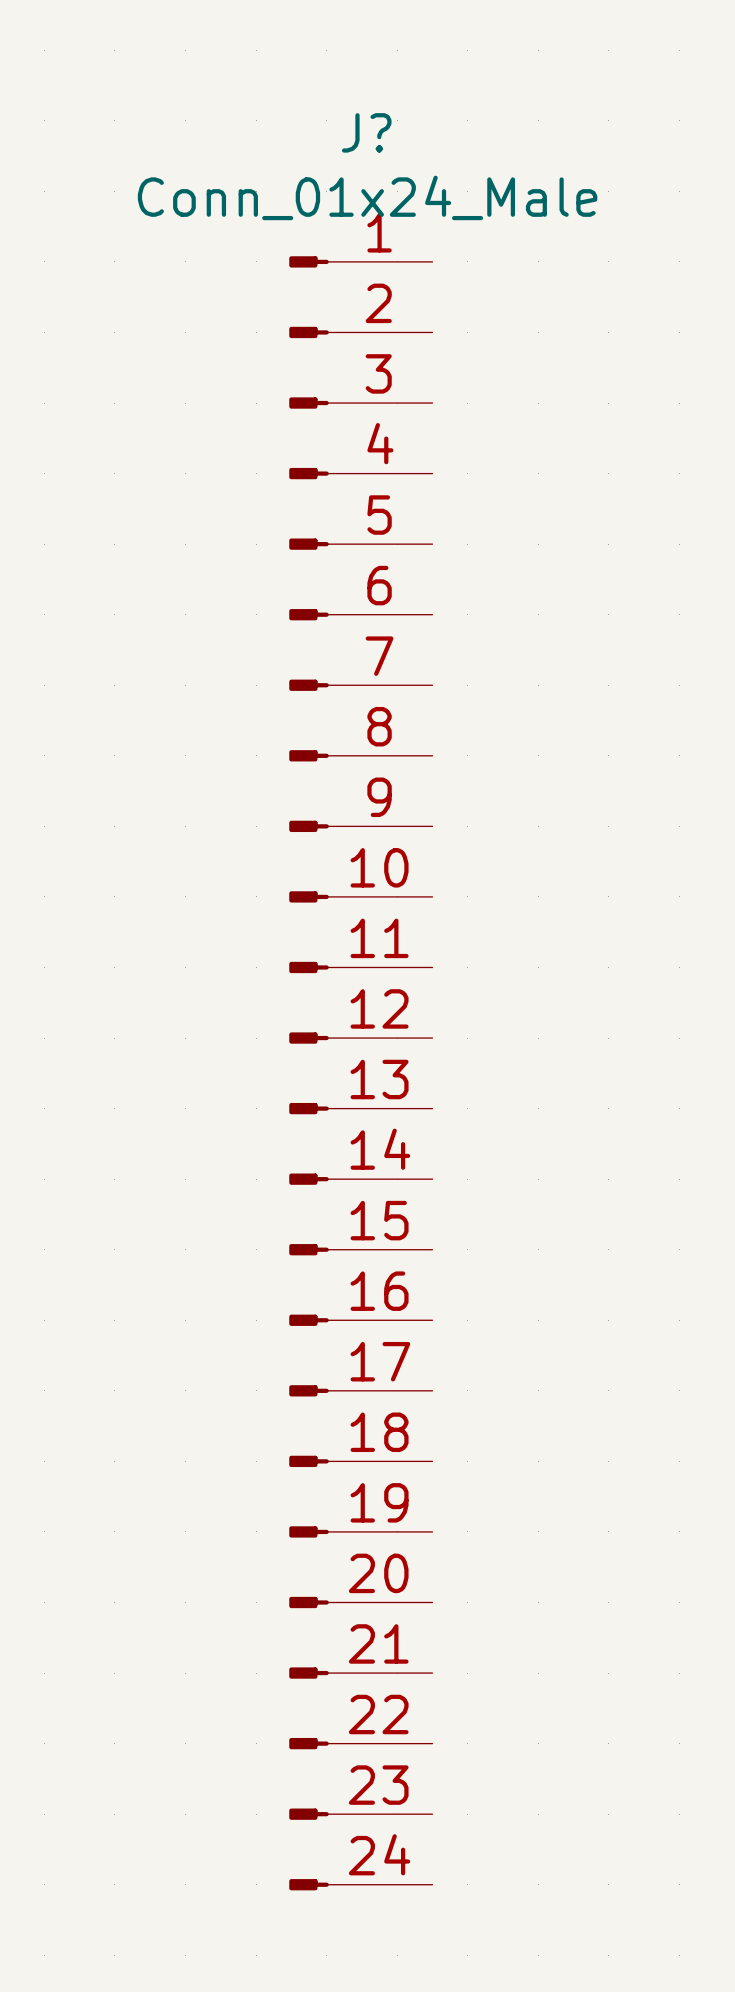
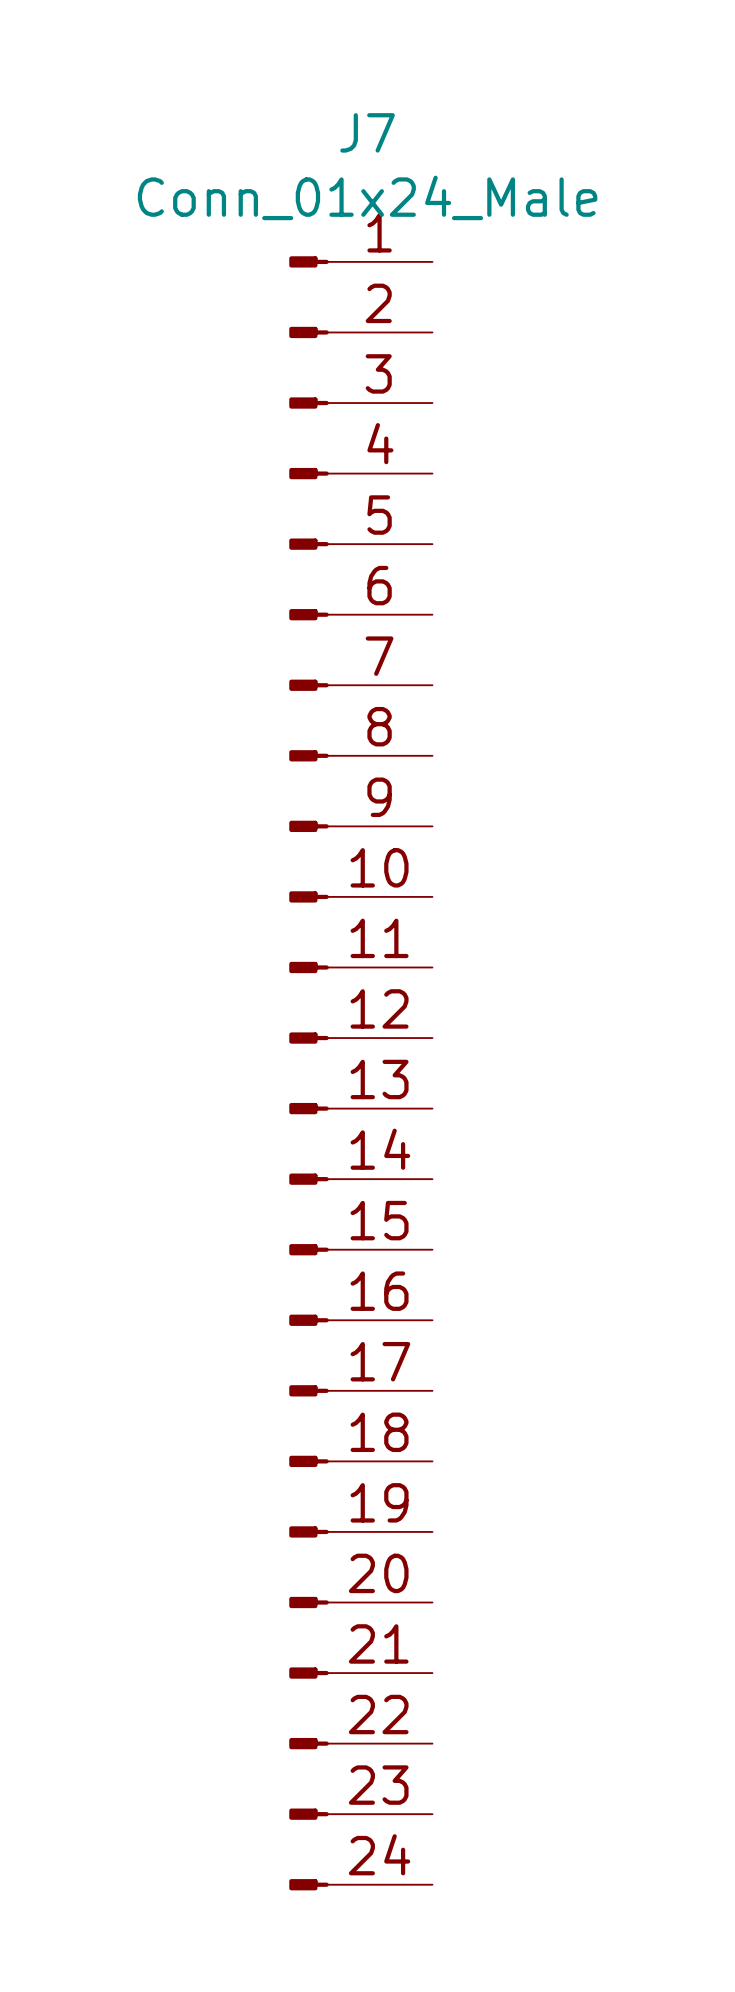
J? name: J? (366, 132) -> J7 (367, 132)

